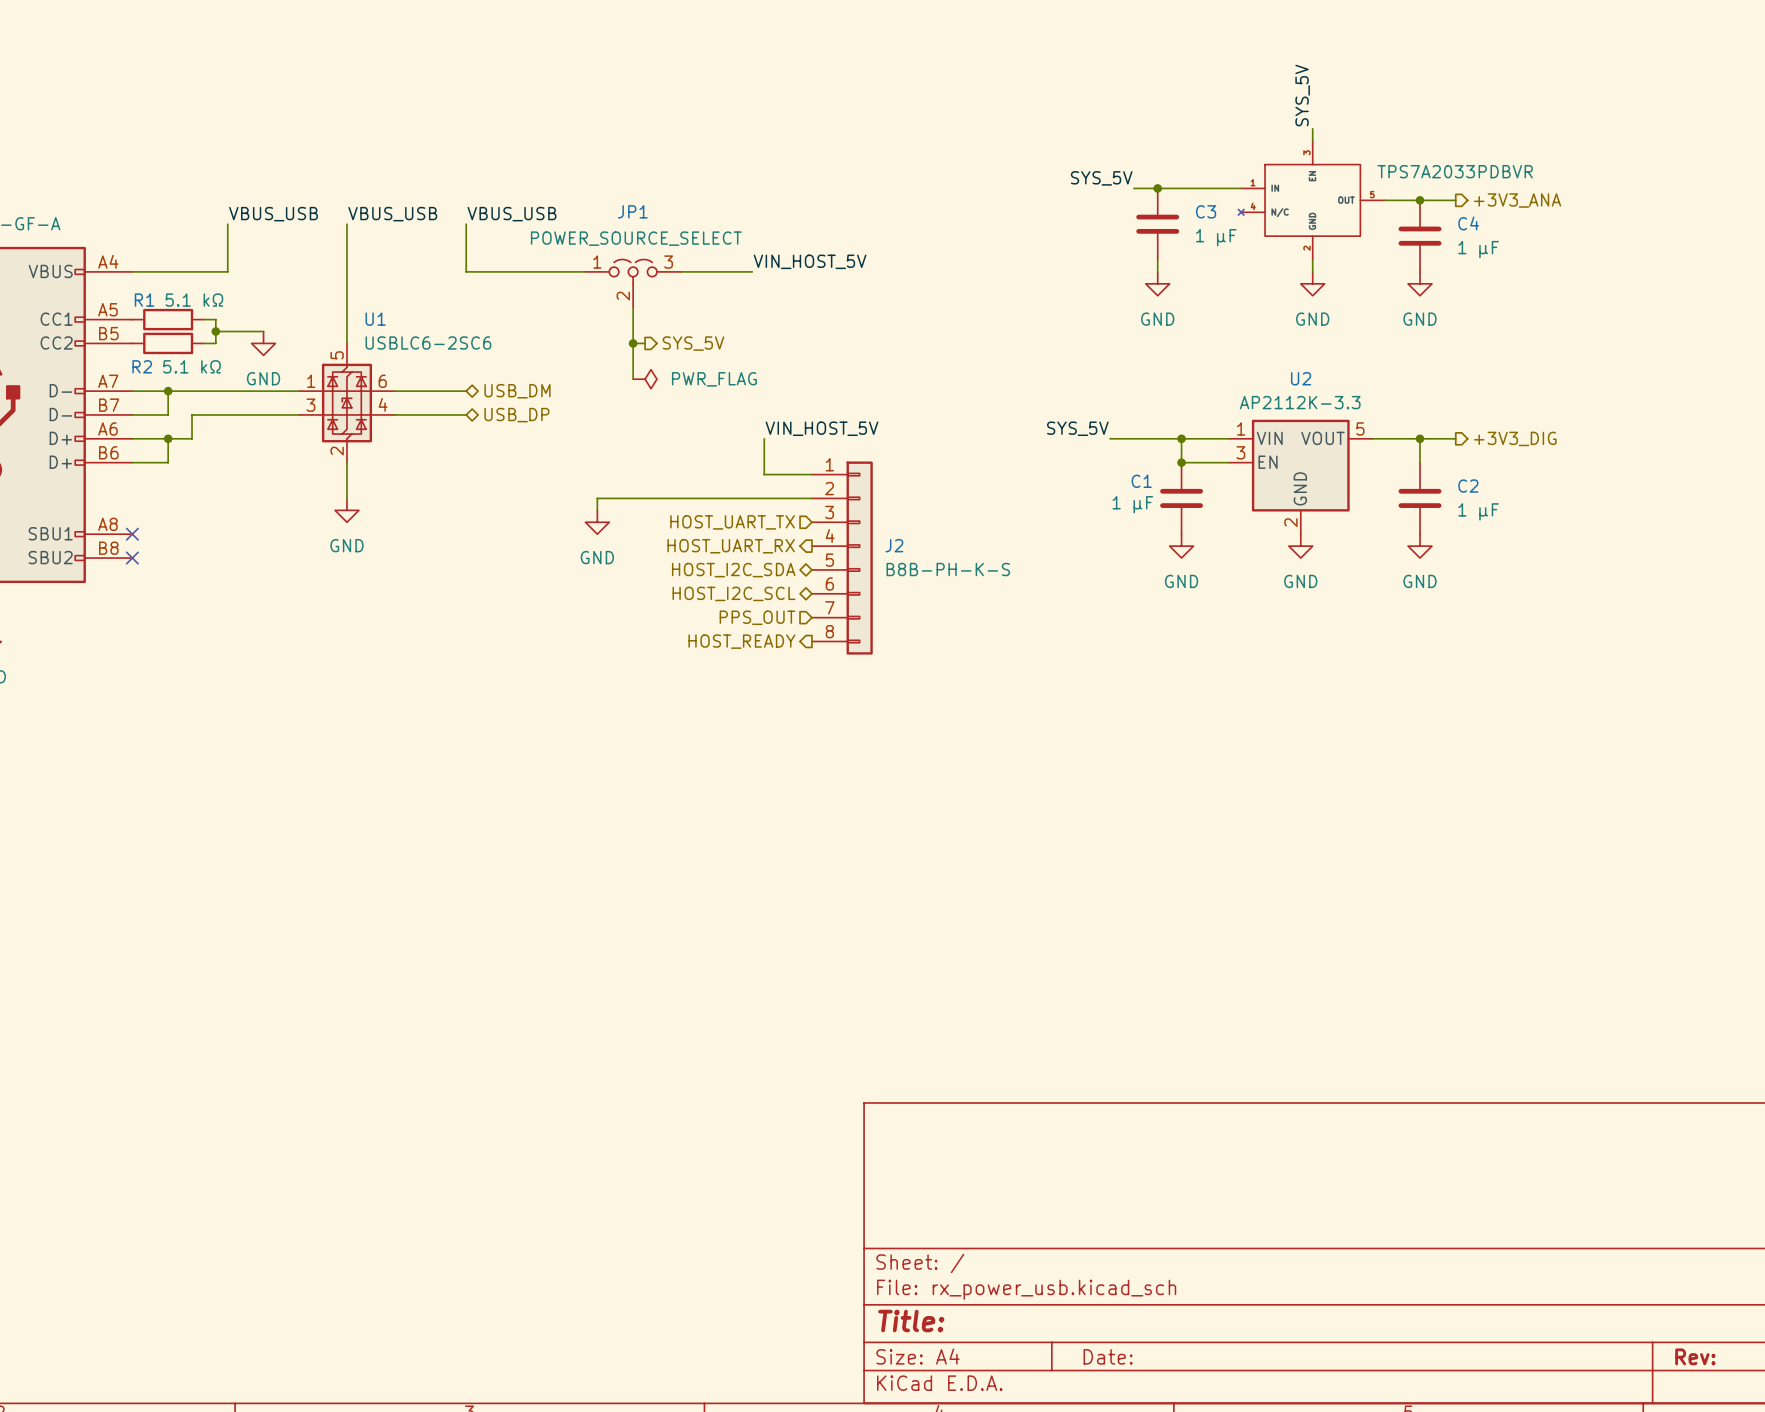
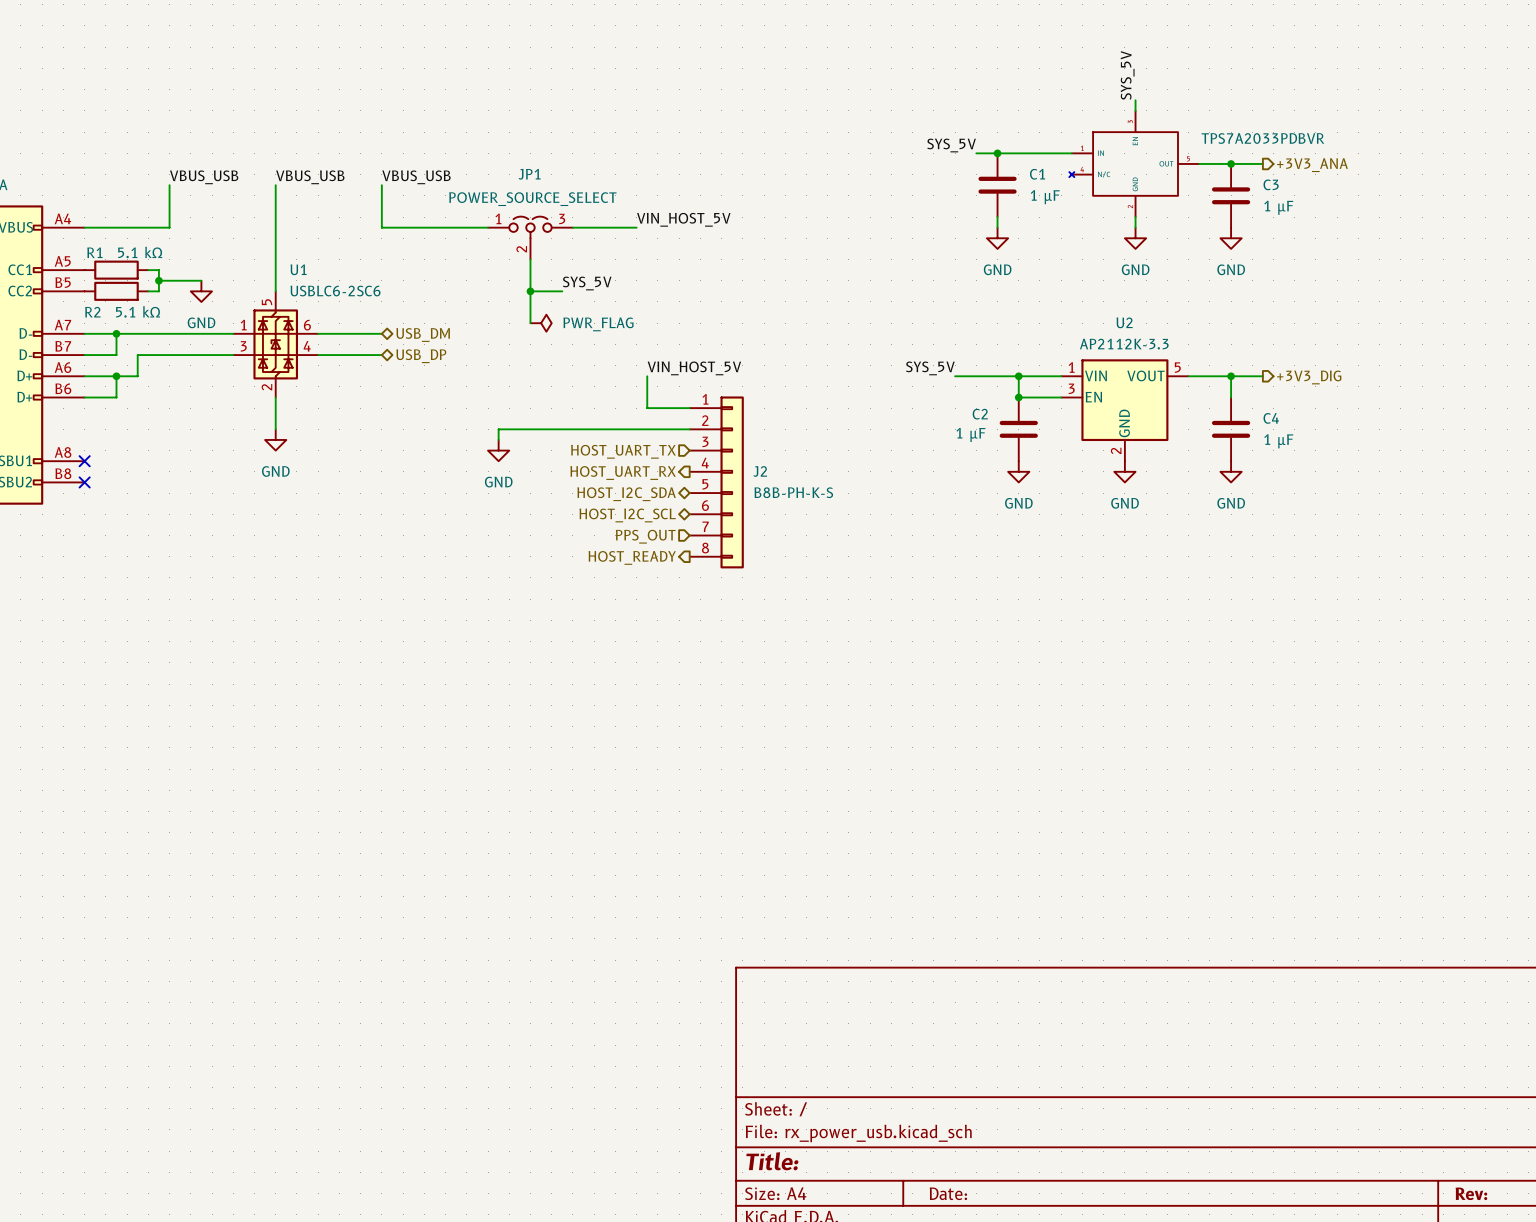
C3 name: C3 (1206, 211) -> C1 (1037, 174)
C4 name: C4 (1468, 223) -> C3 (1271, 184)
label: none -> SYS_5V (587, 283)
wire: none -> (541, 291) (562, 291)
hierarchical label: SYS_5V (693, 343) -> none
C1 name: C1 (1141, 481) -> C2 (980, 414)
C2 name: C2 (1468, 486) -> C4 (1271, 418)

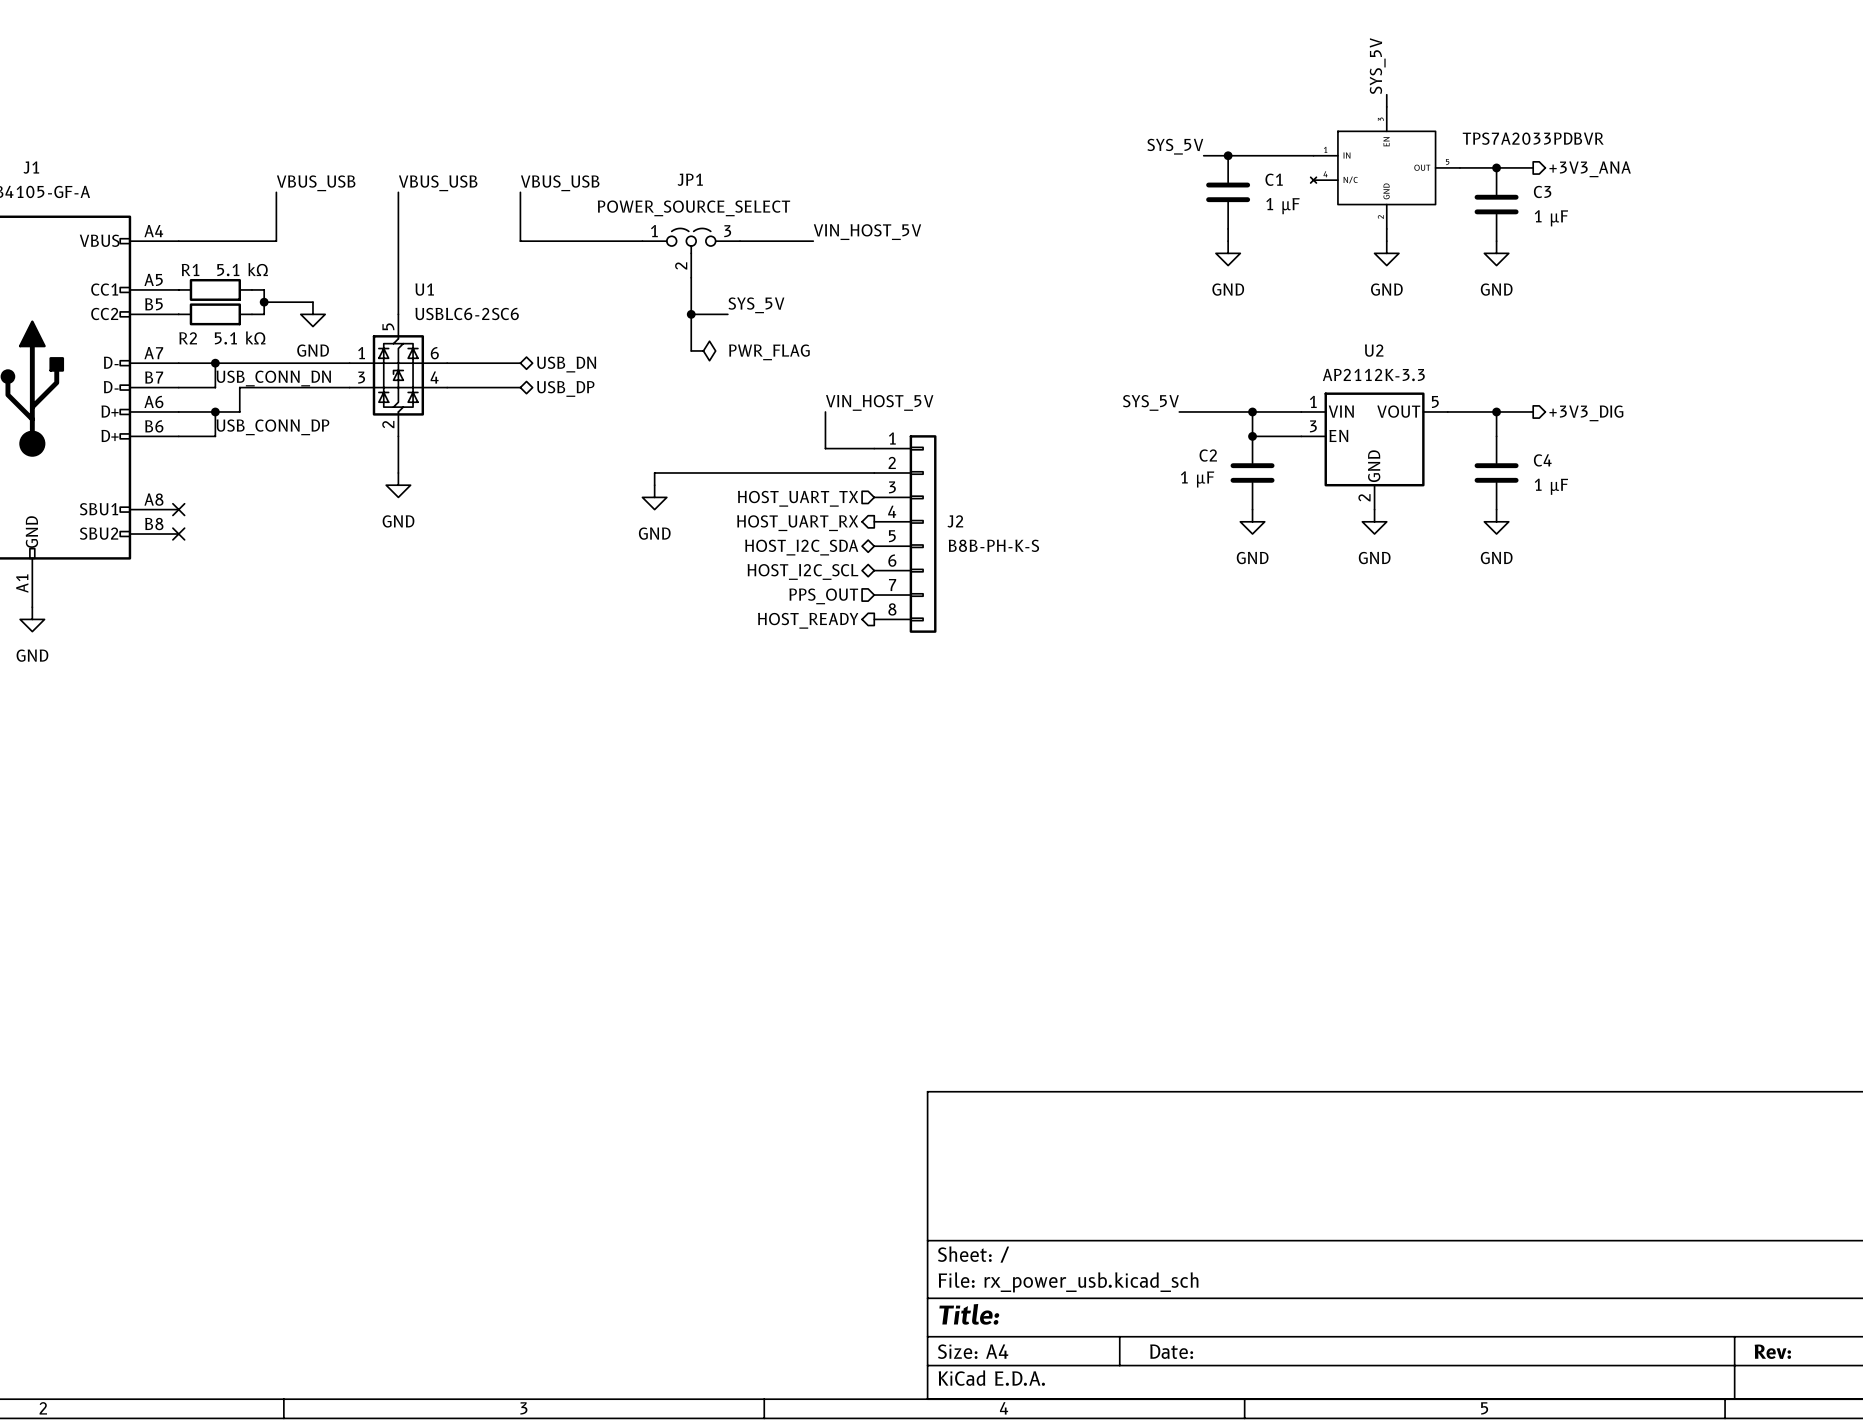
hierarchical label: USB_DM (423, 335) -> USB_DN (566, 364)
label: none -> USB_CONN_DN (273, 378)
label: none -> USB_CONN_DP (272, 427)

